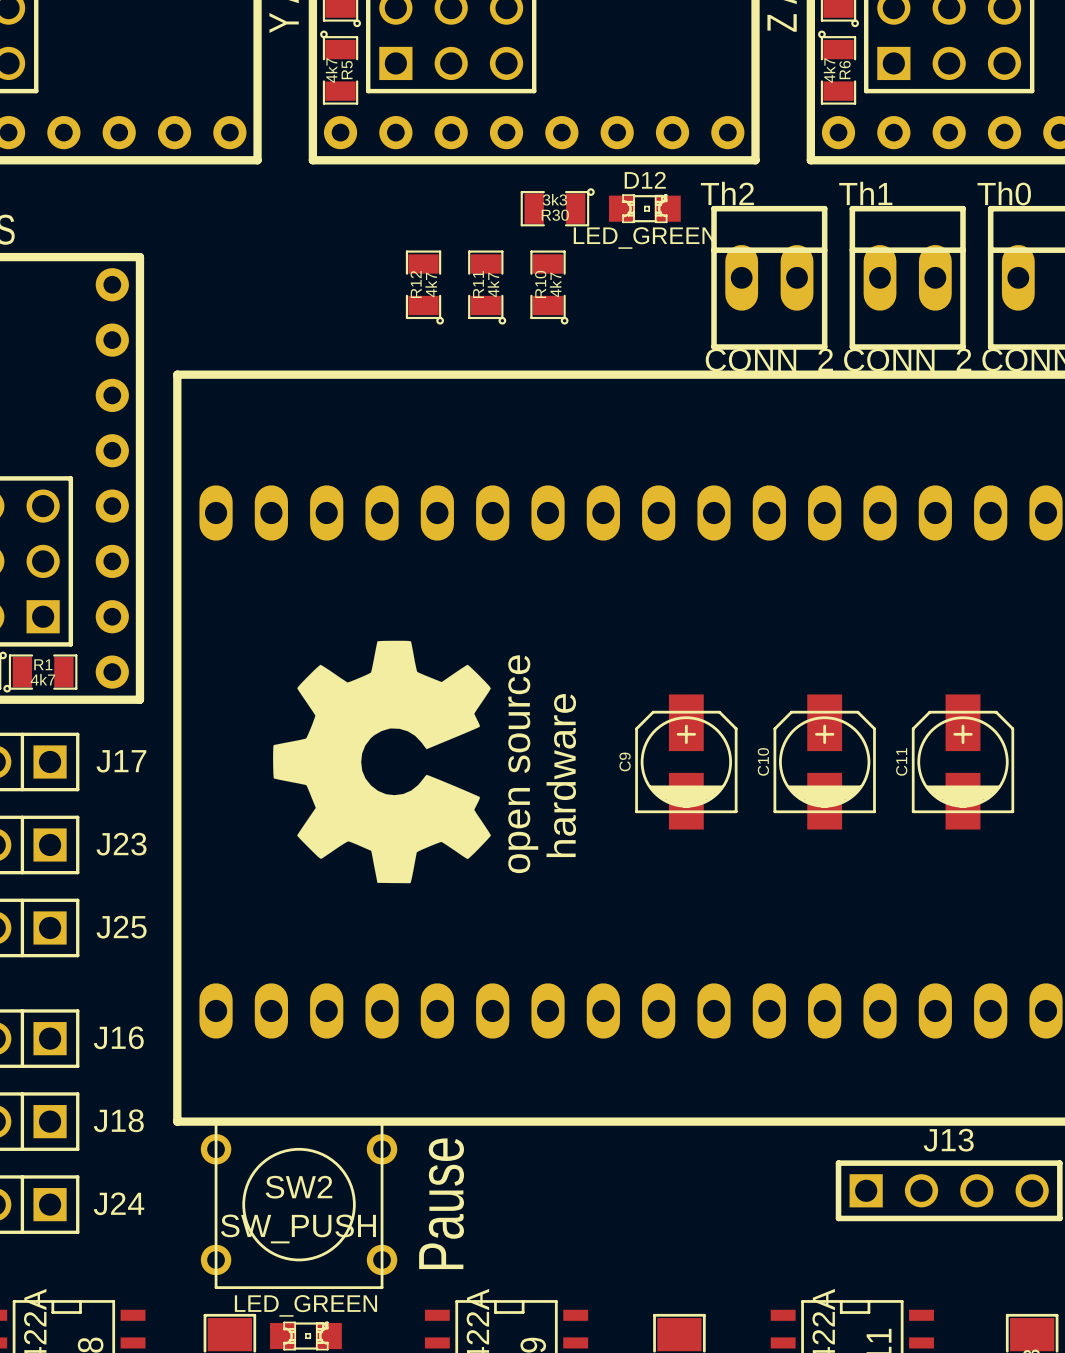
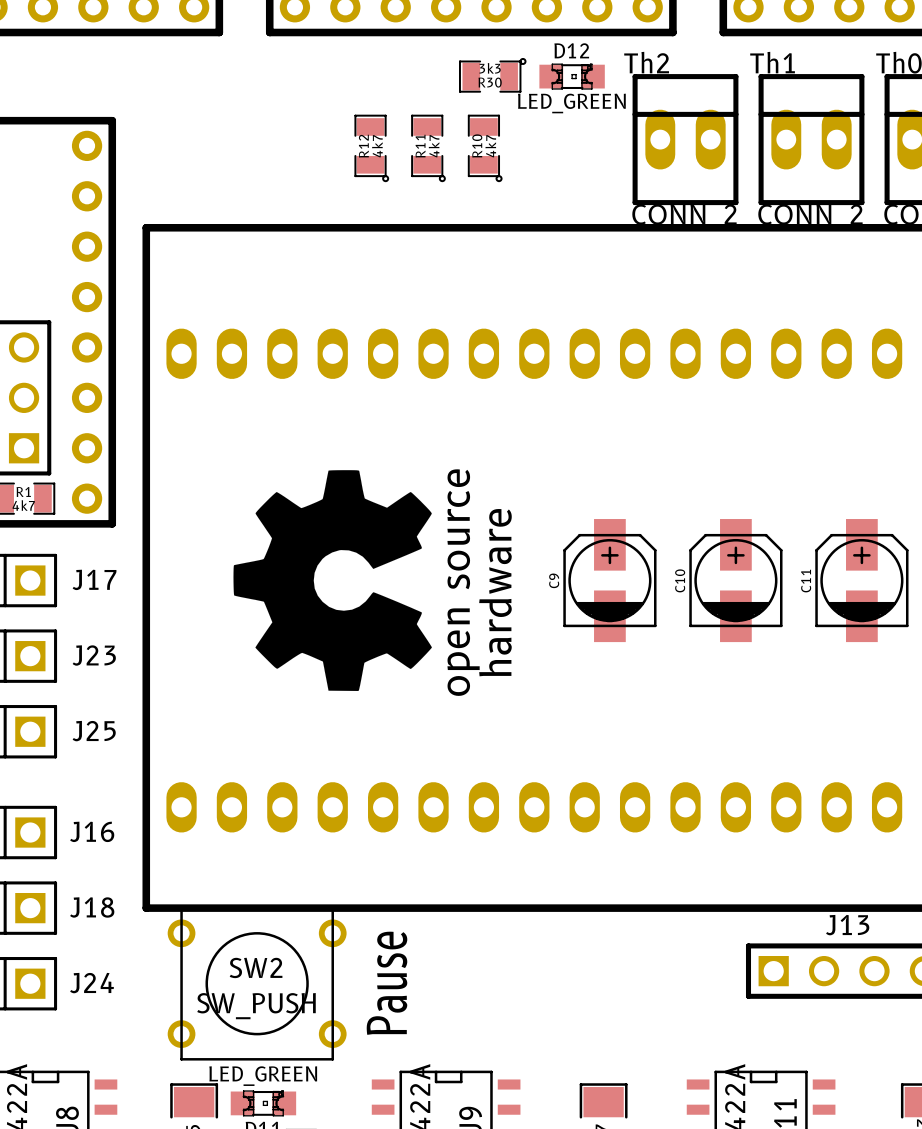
drawing shape: [273, 640, 577, 884] -> [233, 469, 512, 696]

